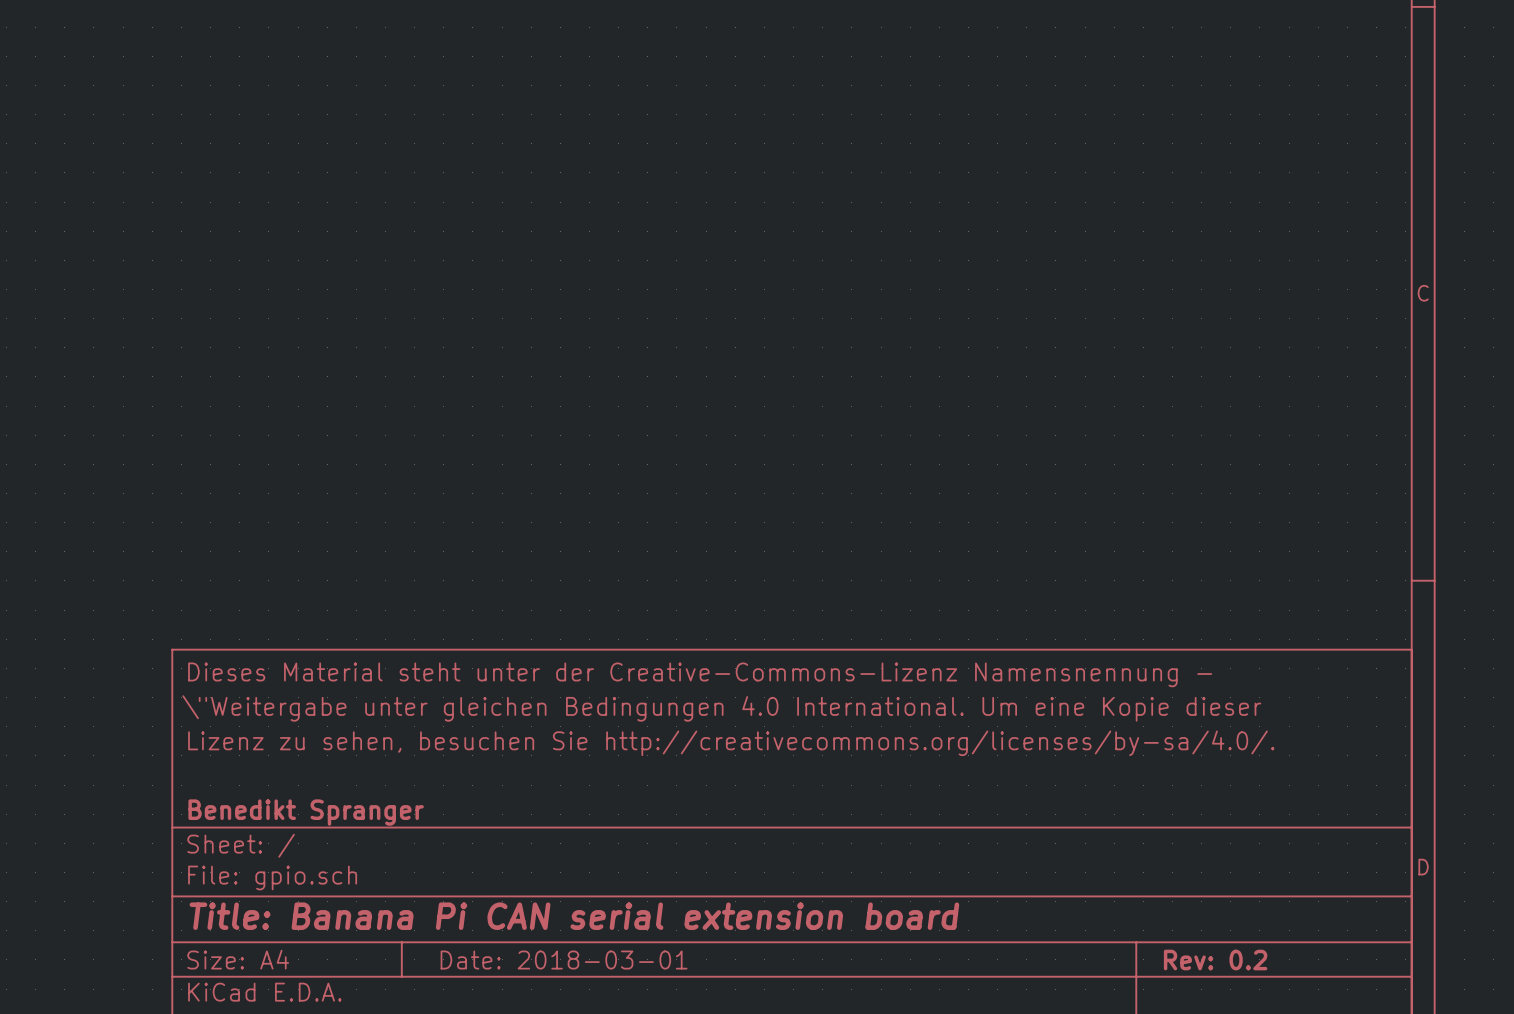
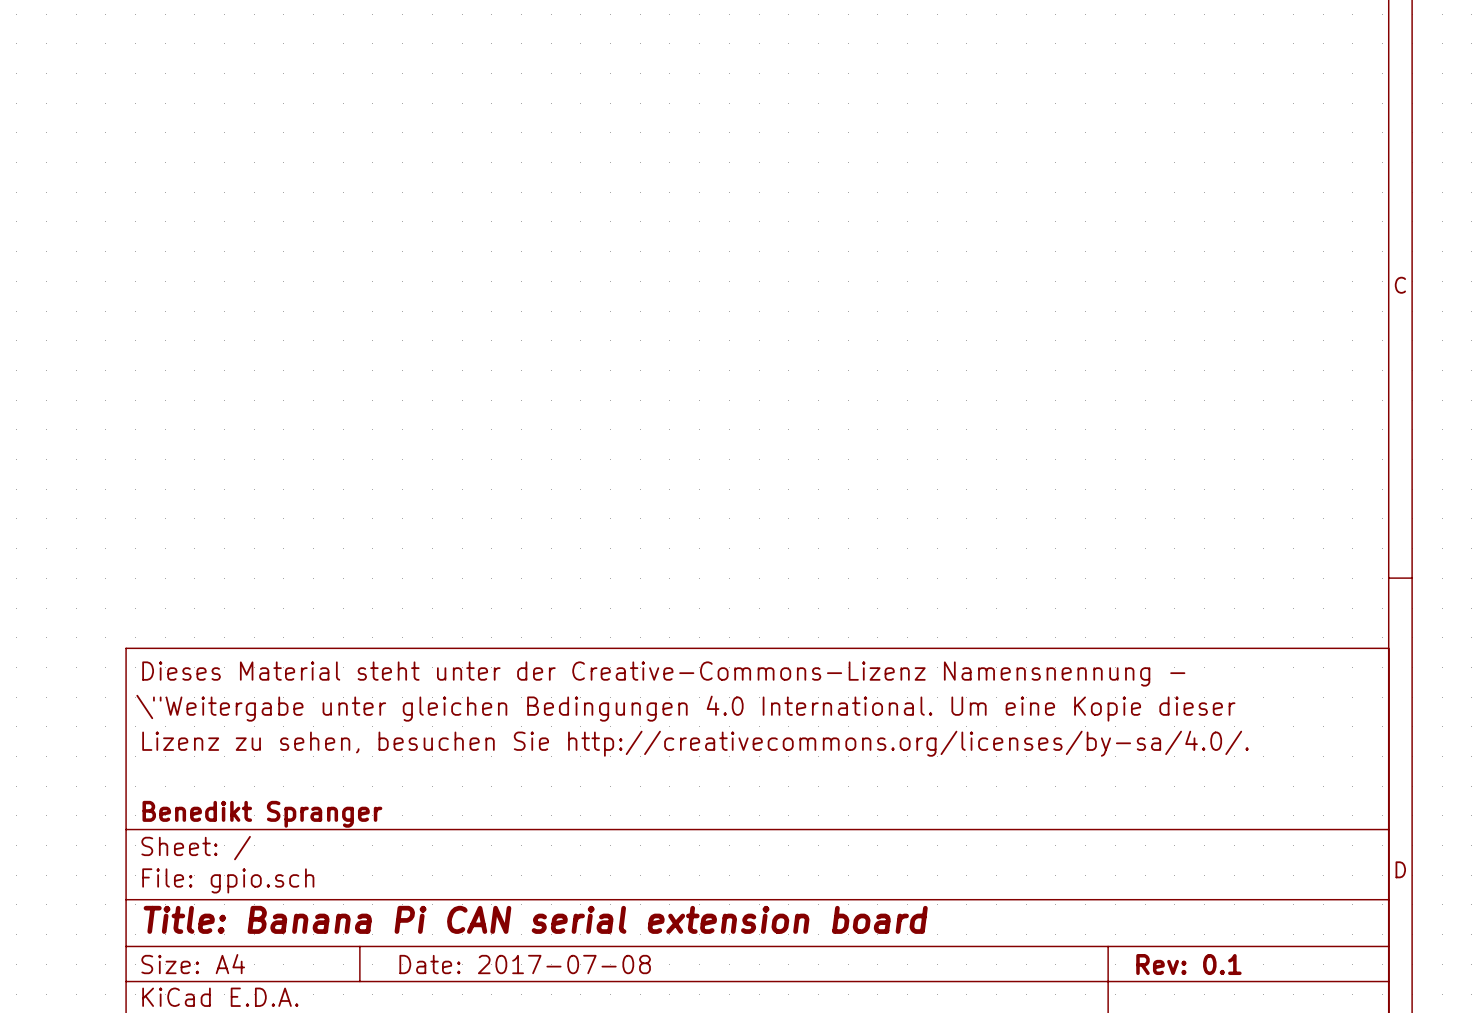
title block: Date: 2018-03-01 (564, 960) -> Date: 2017-07-08 (525, 964)
title block: Rev: 0.2 (1215, 960) -> Rev: 0.1 (1188, 964)

